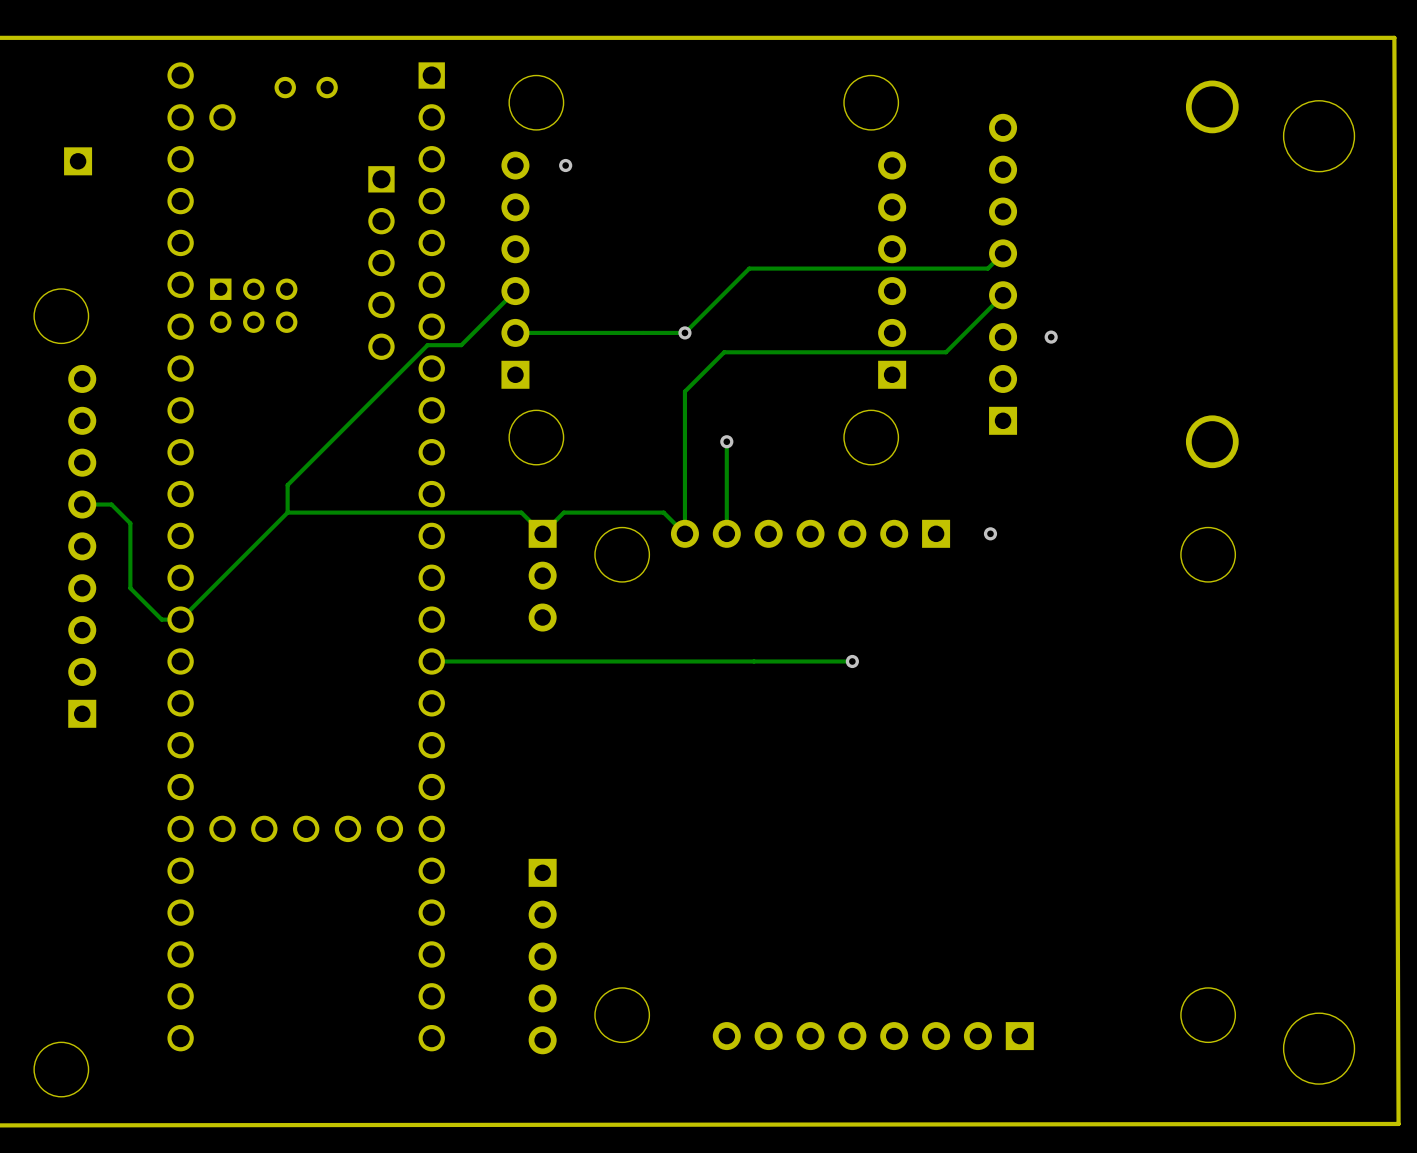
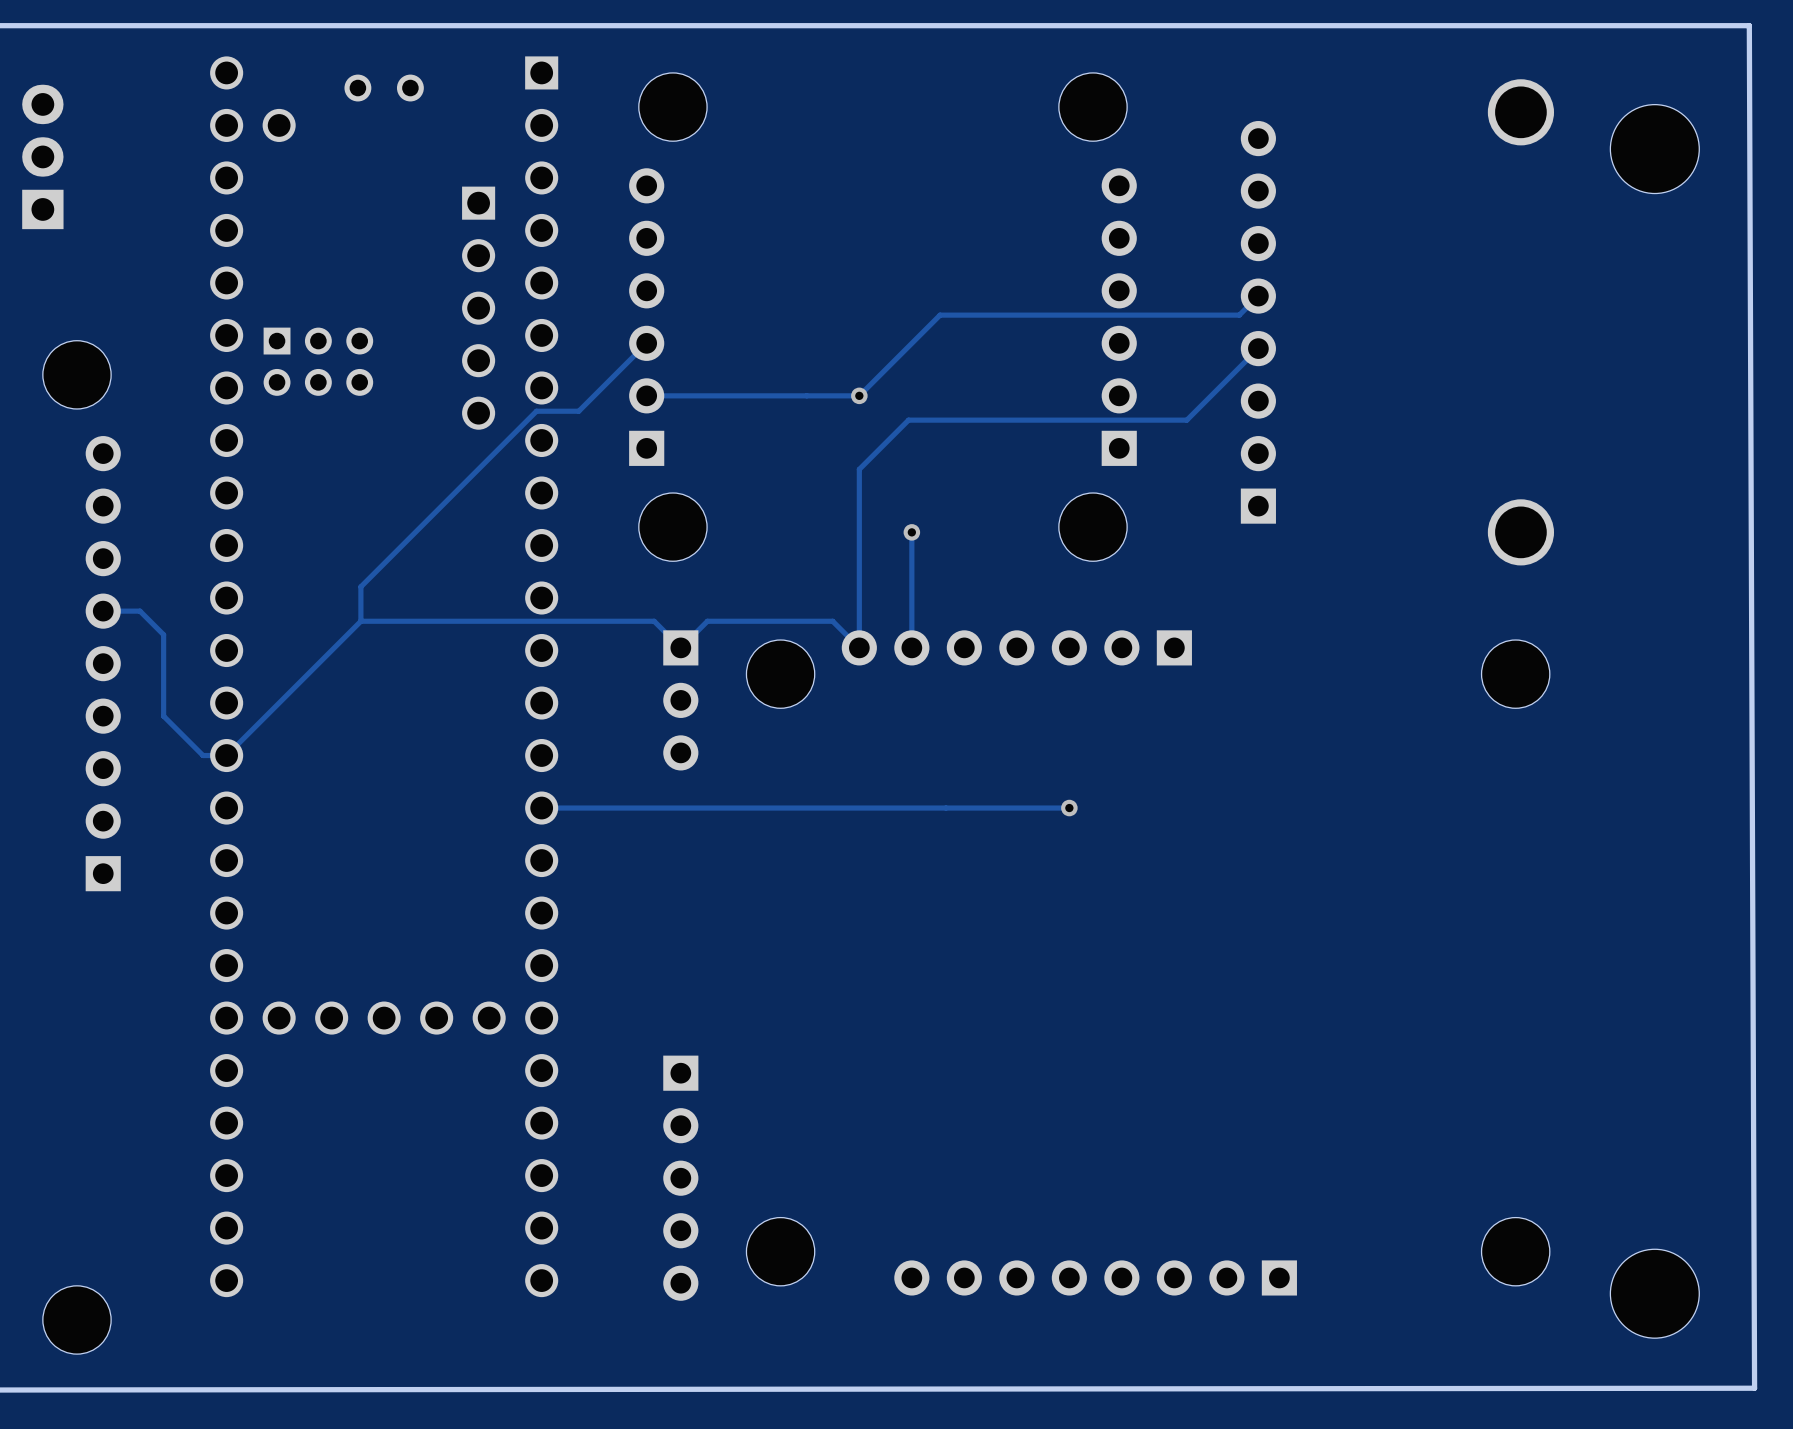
part: none -> (42, 156)
part: (78, 161) -> none
via: (565, 165) -> none
via: (1051, 337) -> none
via: (990, 533) -> none

